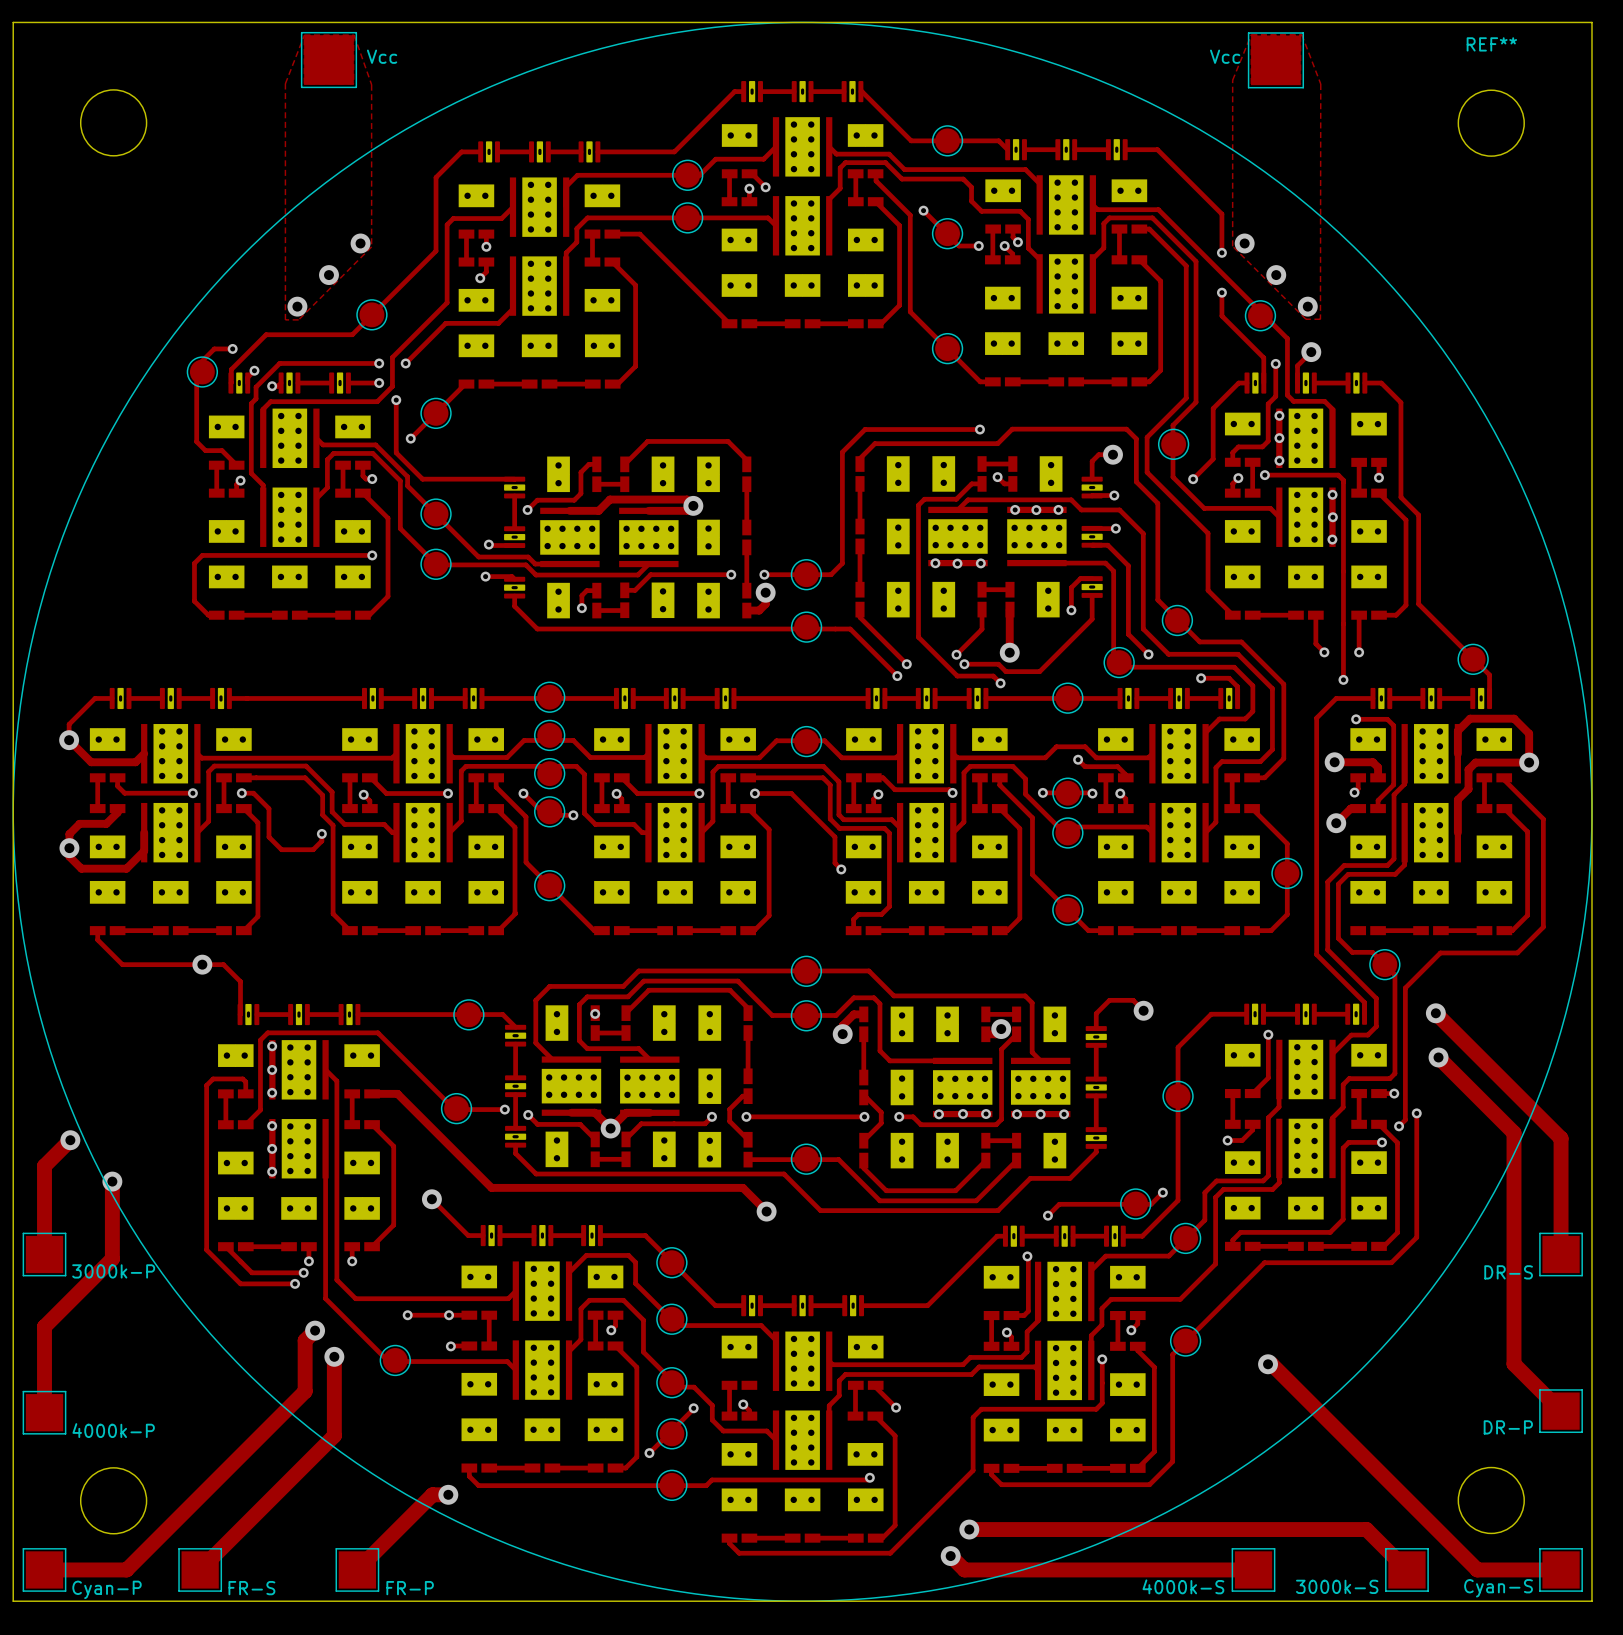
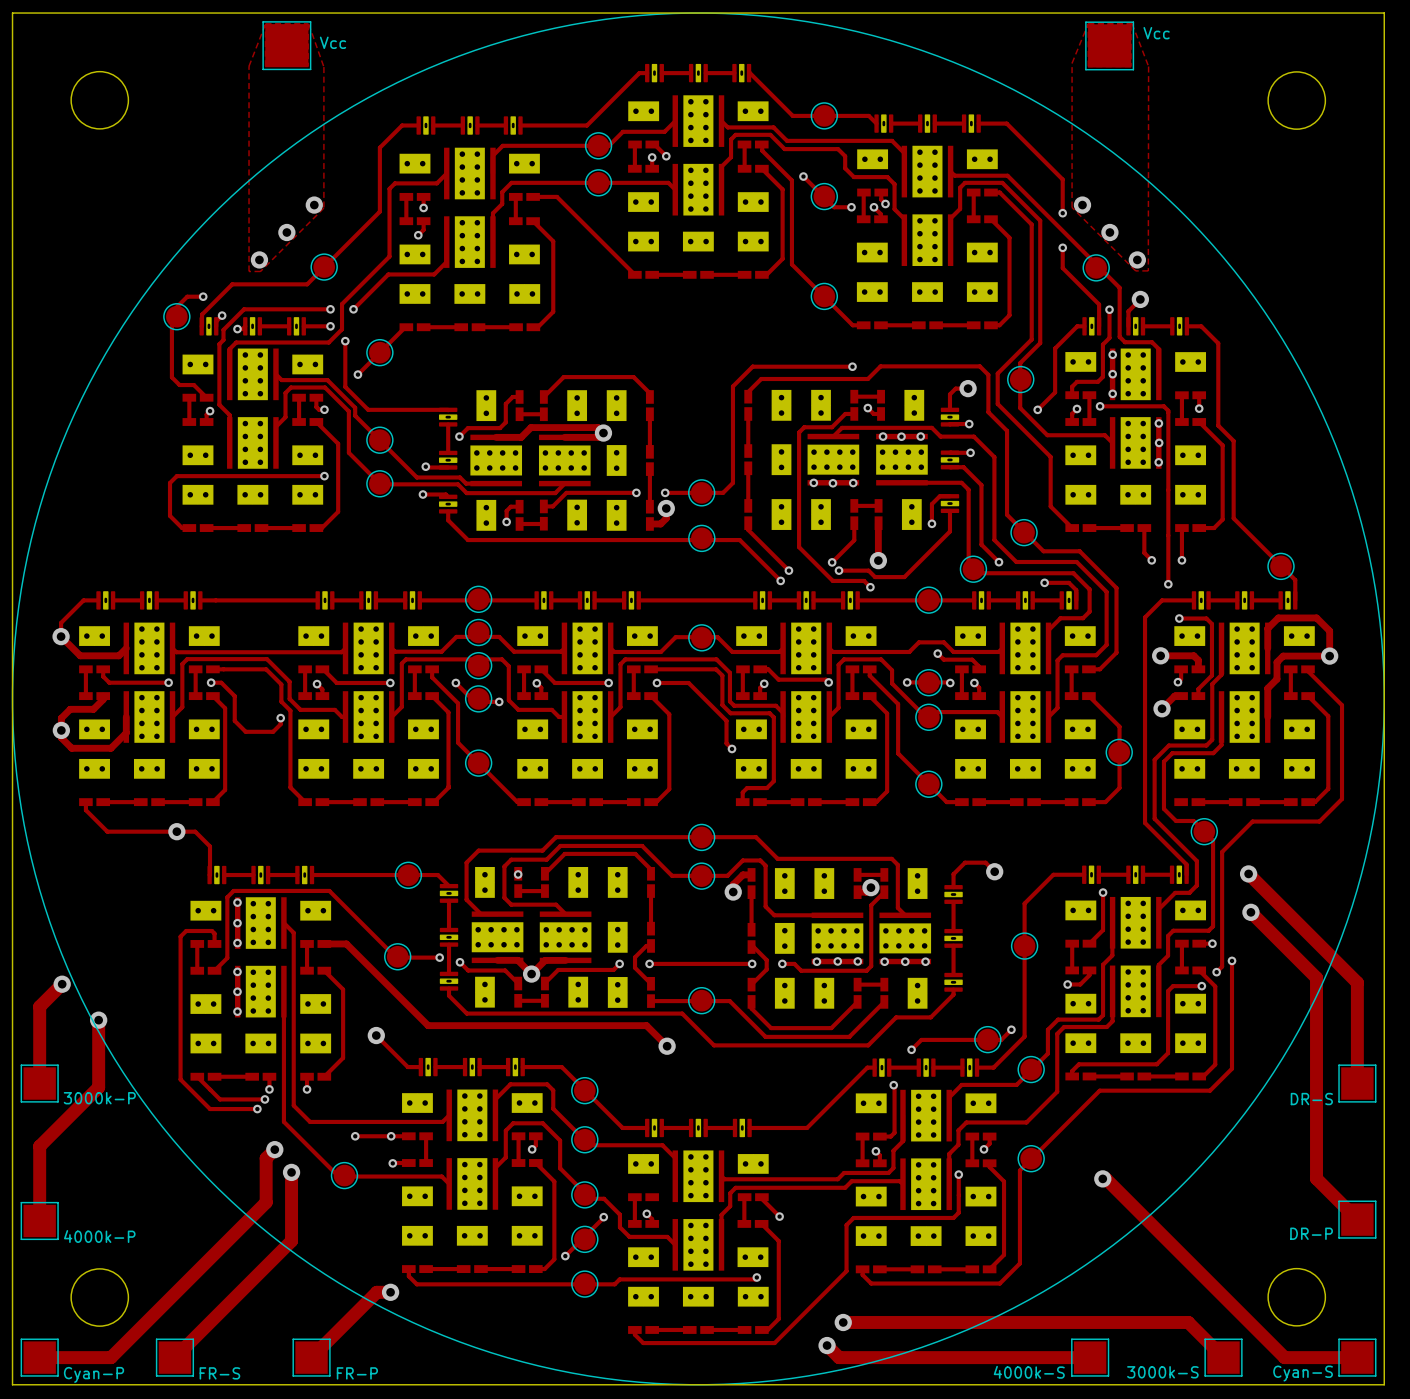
REF** name: REF** (1491, 44) -> none
Vcc name position: Vcc (1225, 56) -> Vcc (1156, 33)

